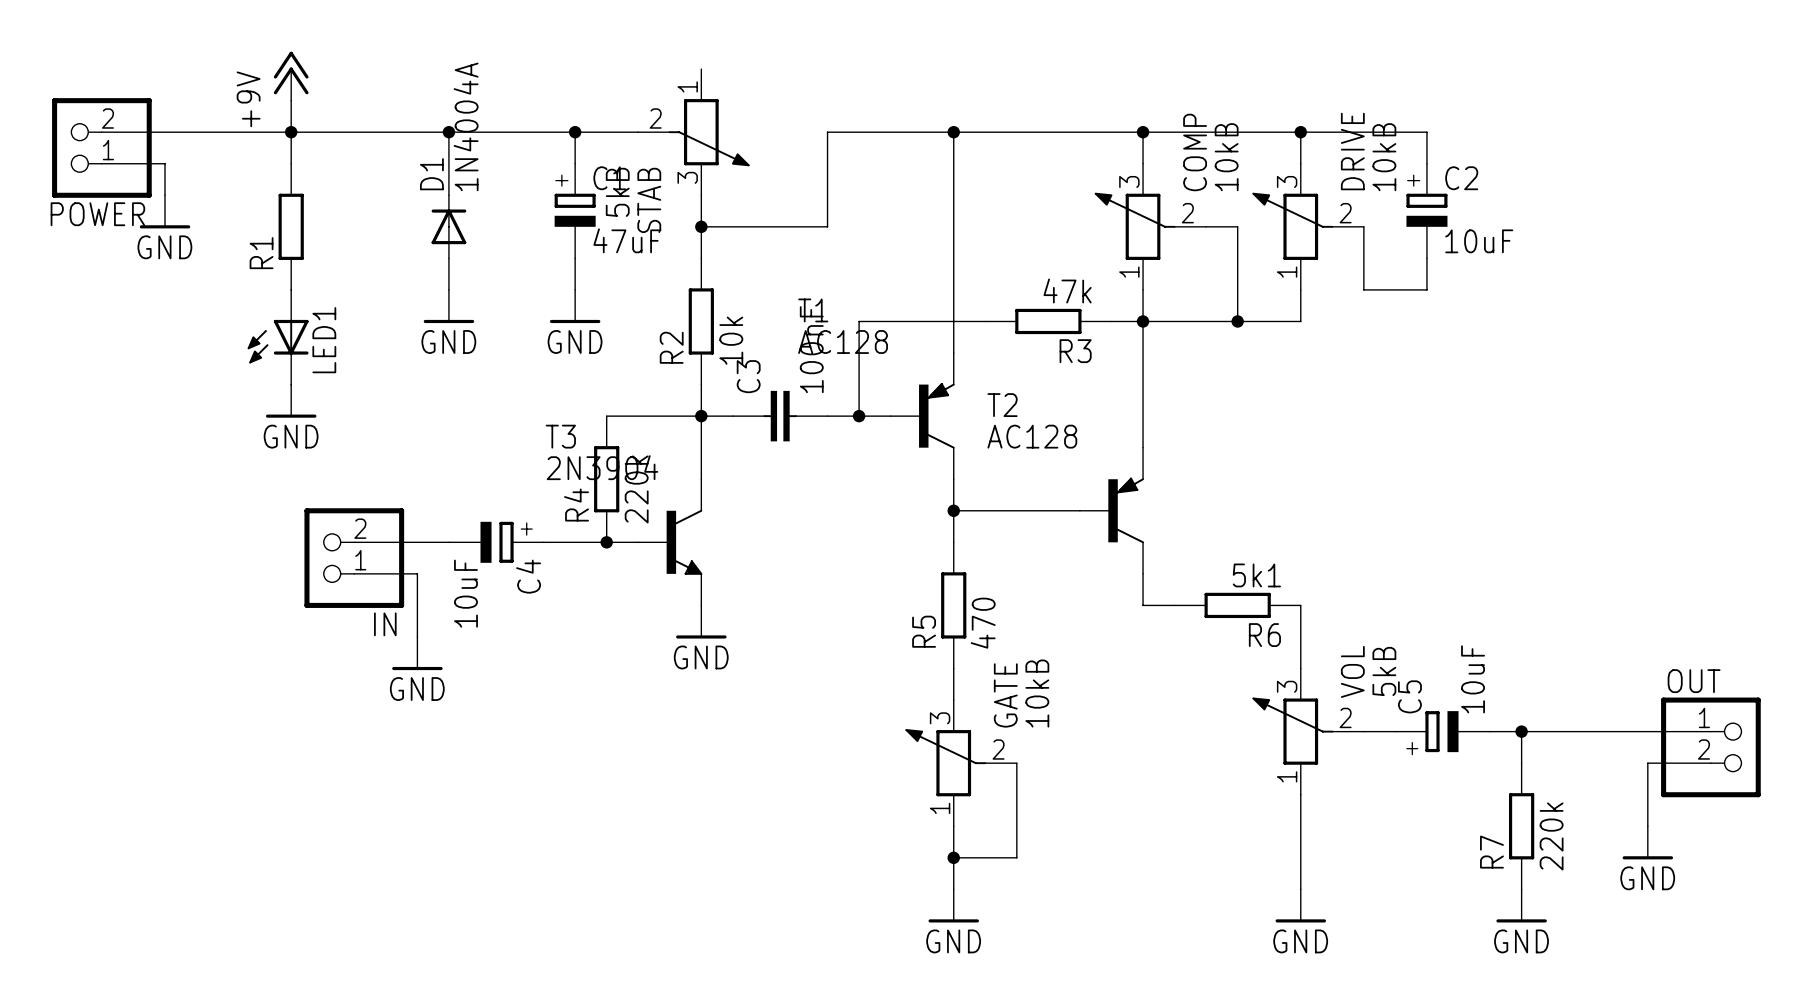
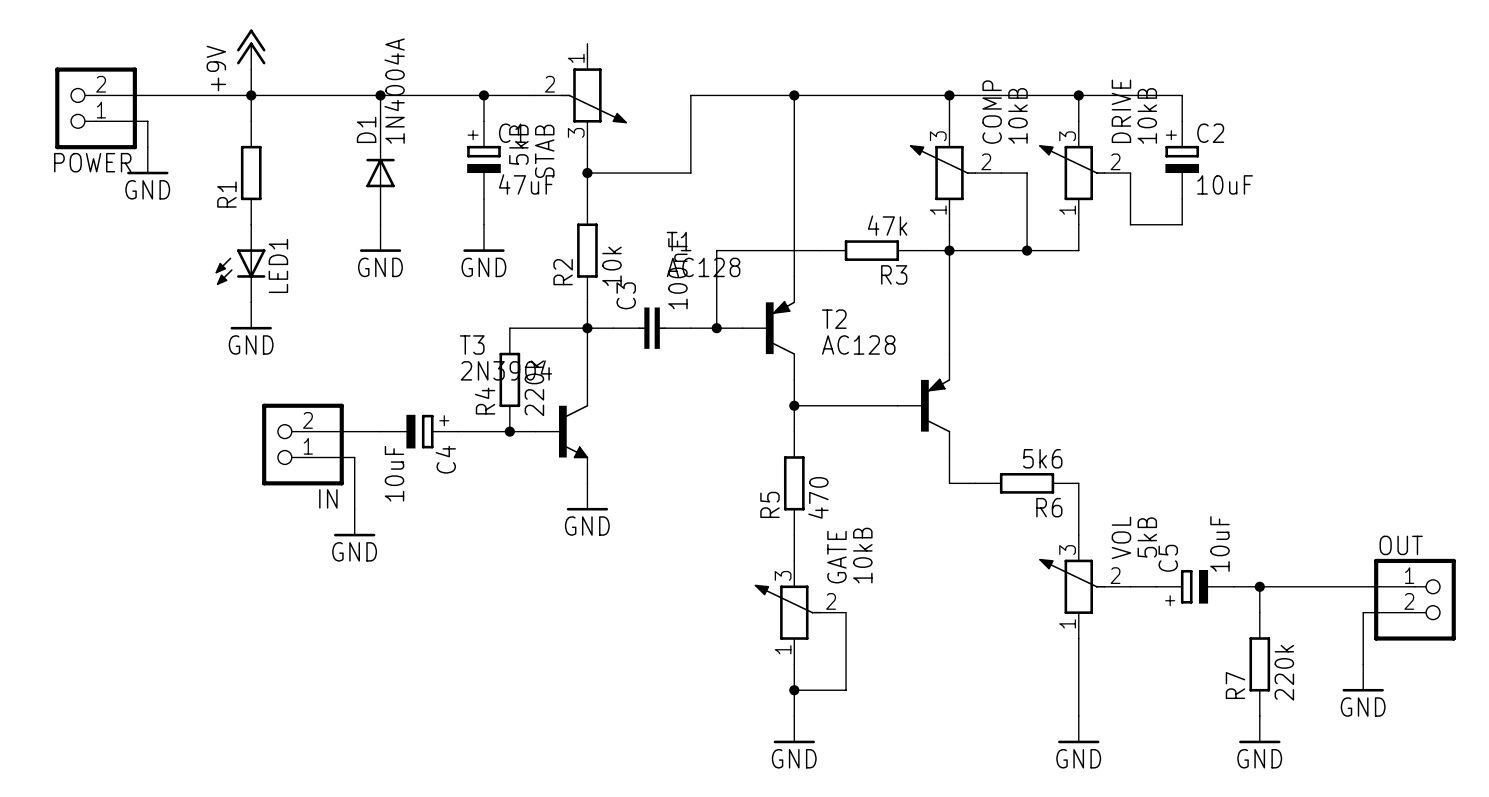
R6 value: 5k1 (1256, 575) -> 5k6 (1042, 458)

